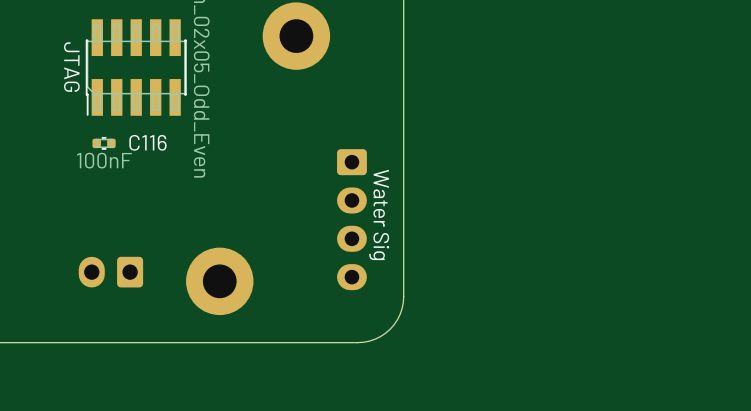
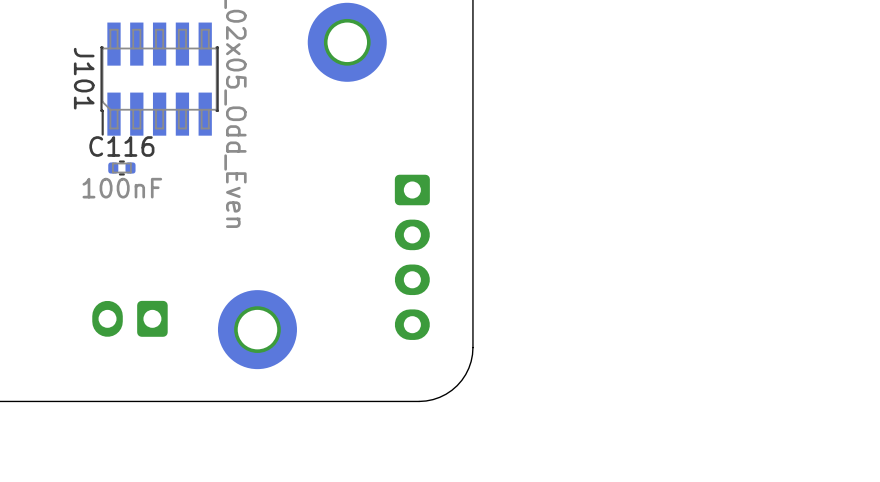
JTAG name: JTAG (71, 67) -> J101 (84, 78)
C116 name position: C116 (147, 142) -> C116 (121, 146)
Water Sig name: Water Sig (379, 214) -> none

